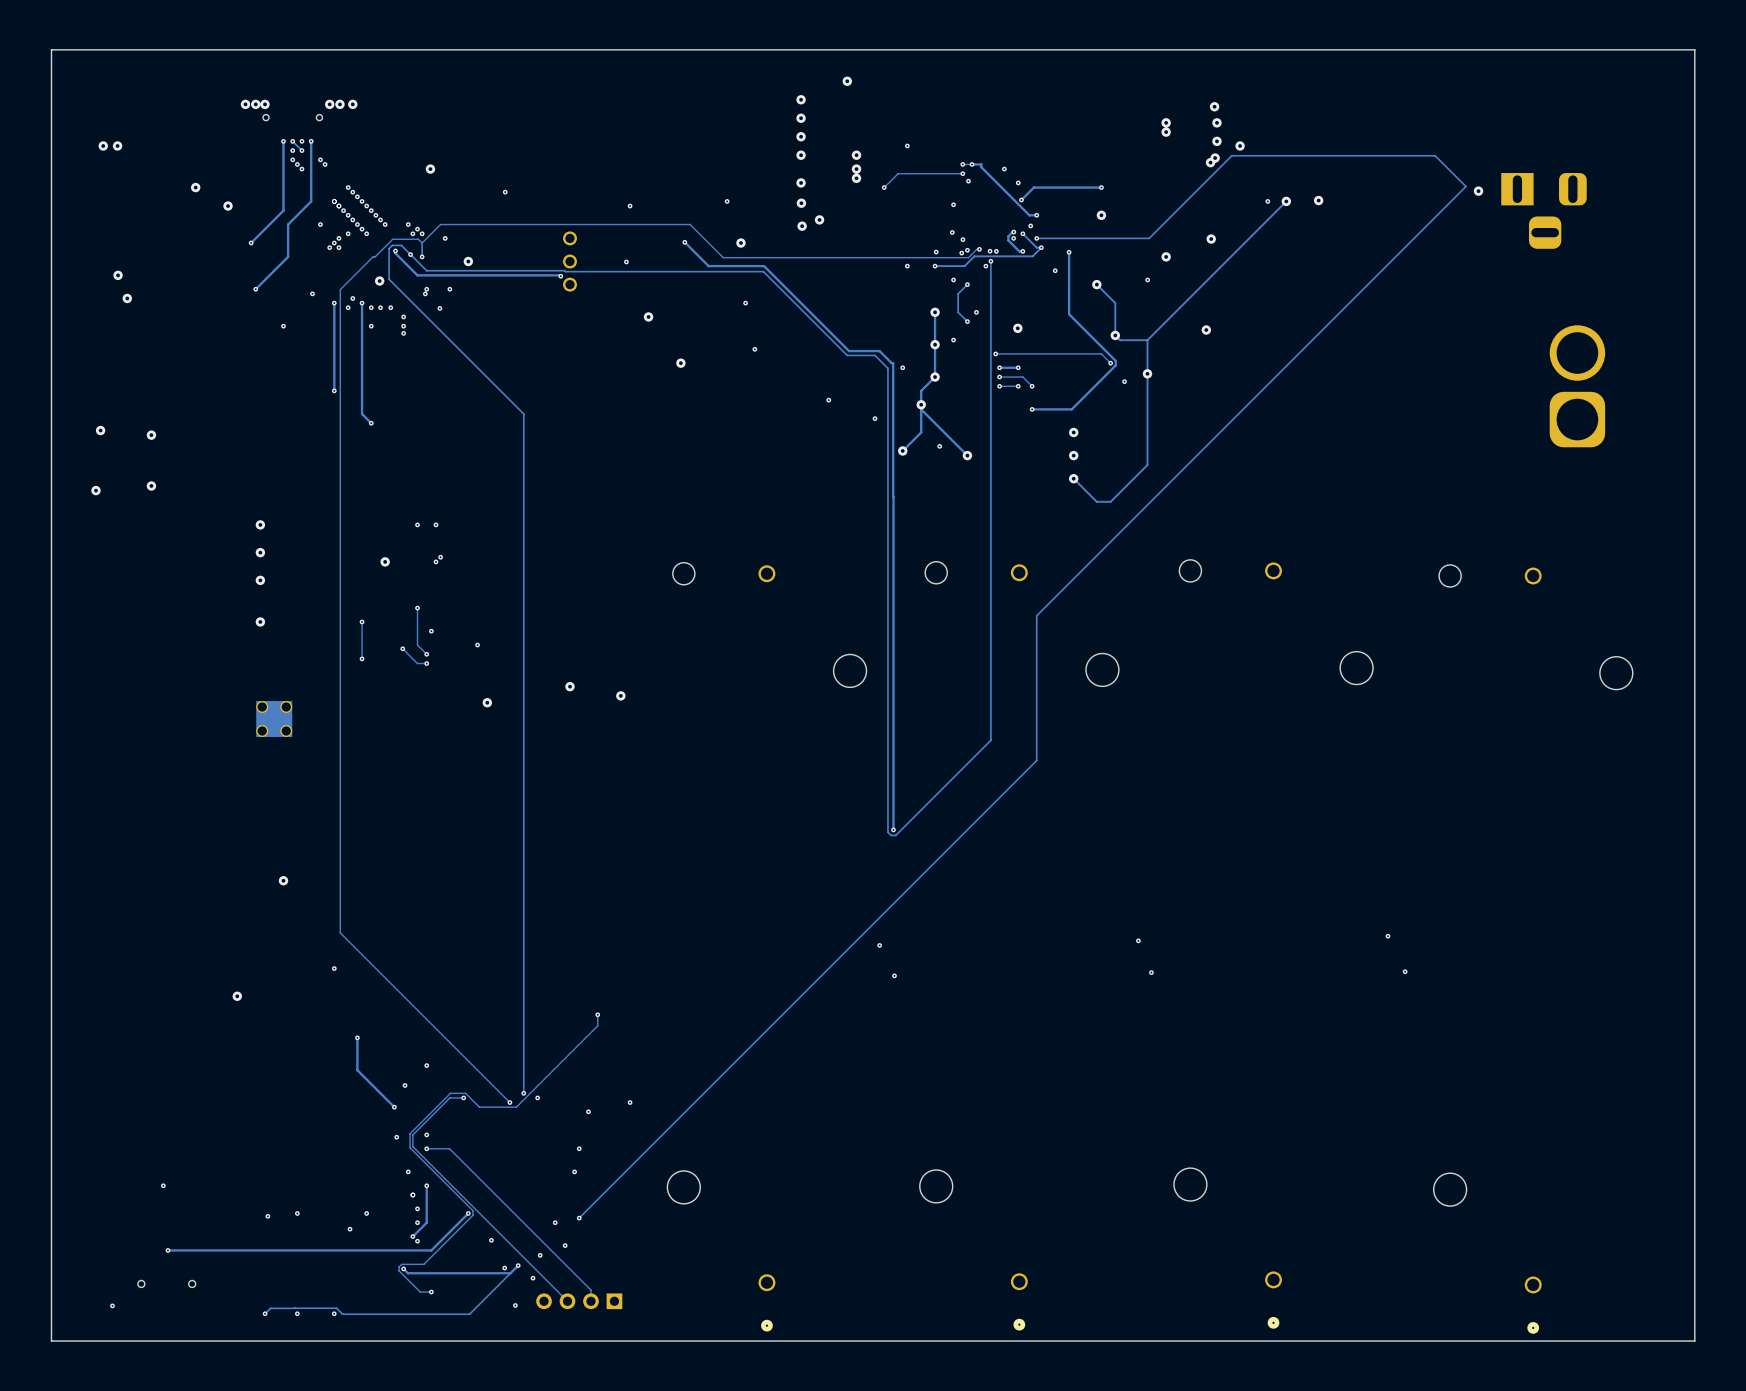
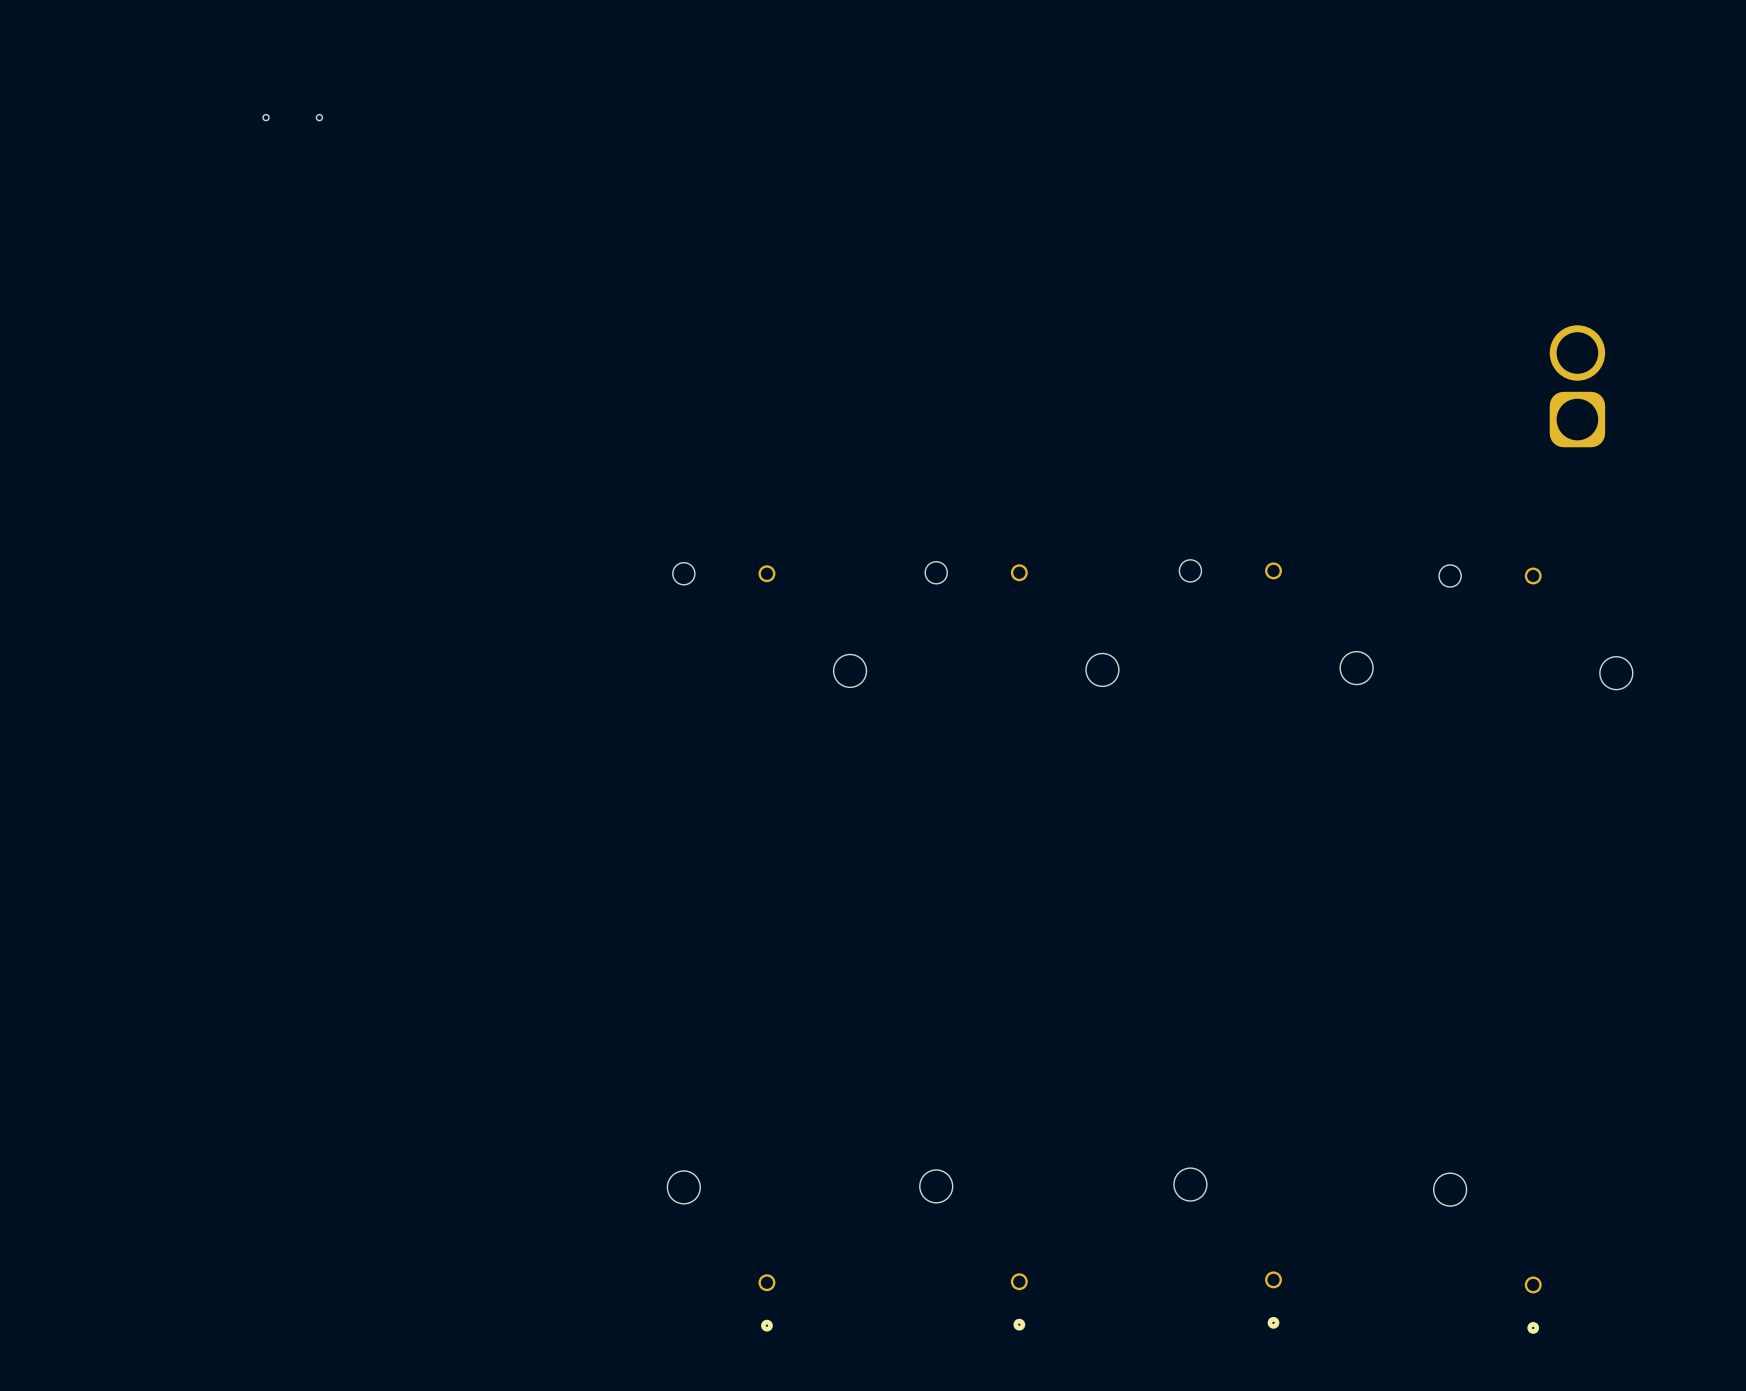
board edge: (1694, 49) (51, 49) (51, 1341) (1694, 1341) (1694, 49) -> none
via: (847, 81) -> none
via: (801, 99) -> none
via: (245, 104) -> none
via: (255, 104) -> none
via: (265, 104) -> none
via: (329, 104) -> none
via: (339, 104) -> none
via: (352, 104) -> none
via: (1214, 106) -> none
via: (801, 118) -> none
via: (1166, 122) -> none
via: (1216, 122) -> none
via: (1166, 132) -> none
via: (801, 136) -> none
track: (283, 141) (283, 210) (251, 243) -> none
via: (283, 141) -> none
track: (292, 141) (301, 150) -> none
via: (292, 141) -> none
via: (301, 141) -> none
track: (311, 141) (311, 201) (288, 224) (288, 256) (255, 289) -> none
via: (311, 141) -> none
via: (1216, 141) -> none
via: (103, 145) -> none
via: (117, 145) -> none
via: (907, 145) -> none
via: (1240, 145) -> none
via: (292, 150) -> none
via: (301, 150) -> none
via: (801, 155) -> none
via: (856, 155) -> none
via: (1215, 158) -> none
via: (292, 159) -> none
via: (320, 159) -> none
via: (1210, 162) -> none
via: (297, 164) -> none
via: (325, 164) -> none
track: (962, 164) (981, 164) (981, 167) (1029, 215) (1036, 215) -> none
via: (962, 164) -> none
via: (972, 164) -> none
via: (301, 169) -> none
via: (430, 169) -> none
via: (856, 169) -> none
via: (1004, 169) -> none
track: (962, 173) (898, 173) (884, 187) -> none
via: (962, 173) -> none
via: (856, 178) -> none
via: (968, 181) -> none
via: (801, 182) -> none
via: (1018, 182) -> none
via: (195, 187) -> none
via: (348, 187) -> none
via: (884, 187) -> none
track: (1101, 187) (1033, 187) (1021, 200) -> none
via: (1101, 187) -> none
via: (1478, 191) -> none
via: (352, 192) -> none
via: (505, 192) -> none
via: (357, 196) -> none
via: (1021, 200) -> none
via: (1318, 200) -> none
via: (334, 201) -> none
via: (362, 201) -> none
via: (727, 201) -> none
via: (1267, 201) -> none
track: (1286, 201) (1147, 340) -> none
via: (1286, 201) -> none
via: (801, 203) -> none
via: (953, 204) -> none
via: (228, 206) -> none
via: (338, 206) -> none
via: (366, 206) -> none
via: (630, 206) -> none
via: (343, 210) -> none
via: (371, 210) -> none
part: (1543, 210) -> none
via: (348, 215) -> none
via: (375, 215) -> none
via: (1036, 215) -> none
via: (1101, 215) -> none
via: (352, 219) -> none
via: (380, 219) -> none
via: (819, 219) -> none
via: (320, 224) -> none
via: (357, 224) -> none
via: (385, 224) -> none
via: (408, 224) -> none
via: (1030, 225) -> none
via: (802, 226) -> none
via: (362, 229) -> none
via: (417, 229) -> none
via: (952, 232) -> none
track: (1013, 232) (1008, 236) (1008, 240) (1019, 251) (1022, 251) -> none
via: (1013, 232) -> none
via: (348, 233) -> none
via: (366, 233) -> none
via: (412, 233) -> none
via: (422, 233) -> none
track: (1022, 233) (1036, 247) (1041, 247) (1032, 256) (974, 256) (964, 266) (935, 266) -> none
via: (1022, 233) -> none
via: (338, 238) -> none
via: (445, 238) -> none
via: (1013, 238) -> none
track: (1036, 238) (1149, 238) (1231, 155) (1435, 155) (1465, 186) (1036, 615) (1036, 760) (579, 1218) -> none
via: (1036, 238) -> none
via: (962, 239) -> none
via: (1211, 239) -> none
track: (684, 242) (708, 266) (764, 266) (849, 351) (879, 351) (893, 363) (893, 829) -> none
via: (684, 242) -> none
via: (251, 243) -> none
via: (334, 243) -> none
track: (422, 243) (418, 239) (392, 239) (340, 289) (340, 932) (509, 1102) -> none
track: (422, 243) (440, 224) (690, 224) (723, 257) (968, 257) (976, 249) (979, 249) -> none
track: (422, 243) (422, 256) -> none
via: (740, 243) -> none
via: (329, 247) -> none
via: (338, 247) -> none
via: (1041, 247) -> none
via: (979, 249) -> none
track: (395, 250) (395, 253) (417, 275) (560, 276) -> none
via: (395, 250) -> none
via: (967, 250) -> none
via: (990, 251) -> none
via: (996, 251) -> none
via: (1022, 251) -> none
via: (936, 252) -> none
track: (1069, 252) (1069, 314) (1115, 361) (1115, 365) (1071, 409) (1032, 409) -> none
via: (1069, 252) -> none
via: (961, 253) -> none
via: (410, 254) -> none
via: (422, 256) -> none
via: (1166, 256) -> none
via: (468, 261) -> none
part: (570, 261) -> none
via: (626, 261) -> none
track: (990, 261) (990, 740) (895, 835) (891, 835) (887, 832) (887, 368) (875, 355) (847, 355) (763, 271) (426, 270) (401, 245) (392, 245) (389, 248) (389, 279) (523, 413) (523, 1093) -> none
via: (990, 261) -> none
via: (907, 266) -> none
via: (935, 266) -> none
via: (985, 266) -> none
via: (1055, 270) -> none
via: (118, 275) -> none
via: (560, 276) -> none
via: (953, 279) -> none
via: (1147, 279) -> none
via: (379, 281) -> none
track: (967, 284) (958, 293) (958, 312) (967, 321) -> none
via: (967, 284) -> none
track: (1096, 284) (1115, 303) (1115, 335) (1120, 340) (1147, 340) -> none
via: (1096, 284) -> none
via: (255, 289) -> none
via: (426, 289) -> none
via: (449, 289) -> none
via: (312, 293) -> none
via: (425, 293) -> none
via: (127, 298) -> none
via: (352, 298) -> none
track: (334, 303) (334, 390) -> none
via: (334, 303) -> none
track: (362, 303) (362, 414) (371, 423) -> none
via: (362, 303) -> none
via: (745, 303) -> none
via: (348, 307) -> none
via: (371, 307) -> none
via: (380, 307) -> none
via: (390, 307) -> none
via: (439, 308) -> none
track: (935, 312) (935, 377) (921, 390) (921, 432) (902, 450) -> none
via: (935, 312) -> none
via: (976, 312) -> none
via: (403, 316) -> none
via: (648, 316) -> none
via: (967, 321) -> none
via: (283, 326) -> none
via: (371, 326) -> none
via: (403, 326) -> none
via: (1017, 328) -> none
via: (1206, 330) -> none
via: (403, 333) -> none
via: (1115, 335) -> none
via: (953, 340) -> none
track: (1147, 340) (1147, 464) (1110, 501) (1096, 501) (1073, 478) -> none
via: (935, 344) -> none
via: (754, 349) -> none
track: (995, 353) (1101, 353) (1110, 363) -> none
via: (995, 353) -> none
via: (680, 363) -> none
via: (1110, 363) -> none
via: (902, 367) -> none
via: (999, 367) -> none
track: (1018, 367) (999, 367) -> none
via: (1018, 367) -> none
via: (1147, 373) -> none
via: (935, 377) -> none
track: (999, 377) (1022, 377) (1032, 386) -> none
via: (999, 377) -> none
via: (1124, 381) -> none
via: (999, 386) -> none
track: (1018, 386) (999, 386) -> none
via: (1018, 386) -> none
via: (1032, 386) -> none
via: (334, 390) -> none
via: (828, 400) -> none
via: (921, 404) -> none
track: (921, 409) (967, 455) -> none
via: (1032, 409) -> none
via: (875, 418) -> none
via: (371, 423) -> none
via: (100, 430) -> none
via: (1073, 432) -> none
via: (151, 435) -> none
via: (939, 446) -> none
via: (902, 450) -> none
via: (967, 455) -> none
via: (1073, 455) -> none
via: (1073, 478) -> none
via: (151, 485) -> none
via: (95, 490) -> none
via: (260, 524) -> none
via: (417, 524) -> none
via: (435, 524) -> none
via: (260, 552) -> none
via: (440, 557) -> none
via: (385, 561) -> none
via: (435, 561) -> none
via: (260, 580) -> none
track: (417, 608) (417, 645) (426, 654) -> none
via: (417, 608) -> none
via: (260, 621) -> none
track: (362, 621) (362, 658) -> none
via: (362, 621) -> none
via: (431, 631) -> none
via: (477, 645) -> none
track: (402, 648) (417, 663) (426, 663) -> none
via: (402, 648) -> none
via: (426, 654) -> none
via: (362, 658) -> none
via: (426, 663) -> none
via: (570, 686) -> none
via: (620, 695) -> none
via: (487, 702) -> none
part: (274, 719) -> none
via: (893, 829) -> none
via: (283, 880) -> none
via: (1387, 936) -> none
via: (1138, 940) -> none
via: (879, 945) -> none
via: (334, 968) -> none
via: (1405, 971) -> none
via: (1151, 972) -> none
via: (894, 975) -> none
via: (237, 996) -> none
track: (597, 1014) (597, 1025) (516, 1107) (479, 1107) (465, 1093) (450, 1093) (410, 1133) (410, 1147) (472, 1210) (472, 1215) (423, 1264) (401, 1264) (399, 1267) (399, 1270) (420, 1292) (431, 1292) -> none
via: (597, 1014) -> none
track: (357, 1037) (357, 1070) (394, 1107) -> none
via: (357, 1037) -> none
via: (426, 1065) -> none
via: (405, 1085) -> none
via: (523, 1093) -> none
track: (463, 1097) (449, 1097) (412, 1134) (412, 1146) (567, 1301) -> none
via: (463, 1097) -> none
via: (537, 1097) -> none
via: (509, 1102) -> none
via: (630, 1102) -> none
via: (394, 1107) -> none
via: (588, 1111) -> none
via: (426, 1134) -> none
via: (396, 1137) -> none
track: (426, 1148) (449, 1148) (590, 1290) (590, 1301) -> none
via: (426, 1148) -> none
via: (579, 1148) -> none
via: (408, 1171) -> none
via: (574, 1171) -> none
via: (163, 1185) -> none
track: (426, 1185) (426, 1222) (412, 1236) -> none
via: (426, 1185) -> none
via: (412, 1194) -> none
via: (417, 1208) -> none
via: (297, 1213) -> none
via: (366, 1213) -> none
track: (468, 1213) (431, 1250) (167, 1250) -> none
via: (468, 1213) -> none
via: (267, 1216) -> none
via: (579, 1218) -> none
via: (417, 1222) -> none
via: (555, 1222) -> none
via: (350, 1229) -> none
via: (412, 1236) -> none
via: (491, 1240) -> none
via: (417, 1241) -> none
via: (565, 1245) -> none
via: (167, 1250) -> none
via: (540, 1255) -> none
via: (518, 1265) -> none
track: (403, 1268) (407, 1273) (510, 1273) (518, 1265) (469, 1314) (342, 1314) (336, 1308) (270, 1308) (265, 1313) -> none
via: (403, 1268) -> none
via: (504, 1268) -> none
via: (533, 1278) -> none
part: (141, 1283) -> none
part: (192, 1283) -> none
via: (431, 1292) -> none
part: (579, 1301) -> none
via: (112, 1305) -> none
via: (515, 1305) -> none
via: (265, 1313) -> none
via: (297, 1313) -> none
via: (334, 1313) -> none

